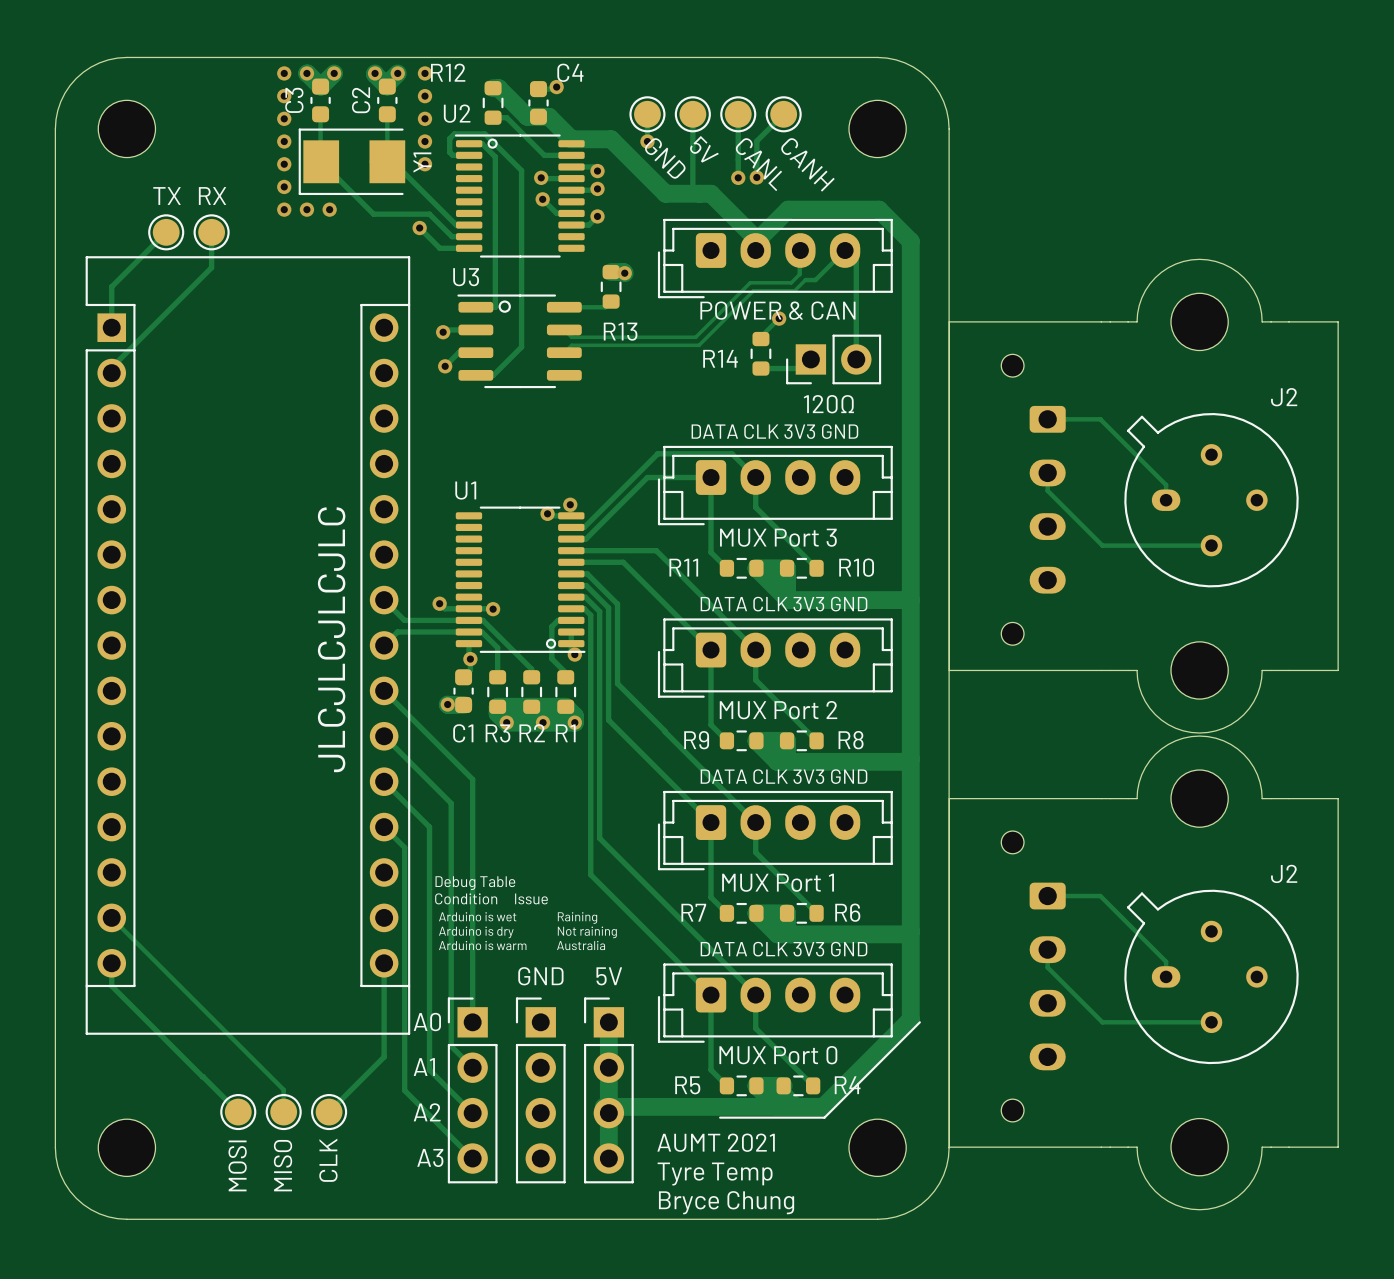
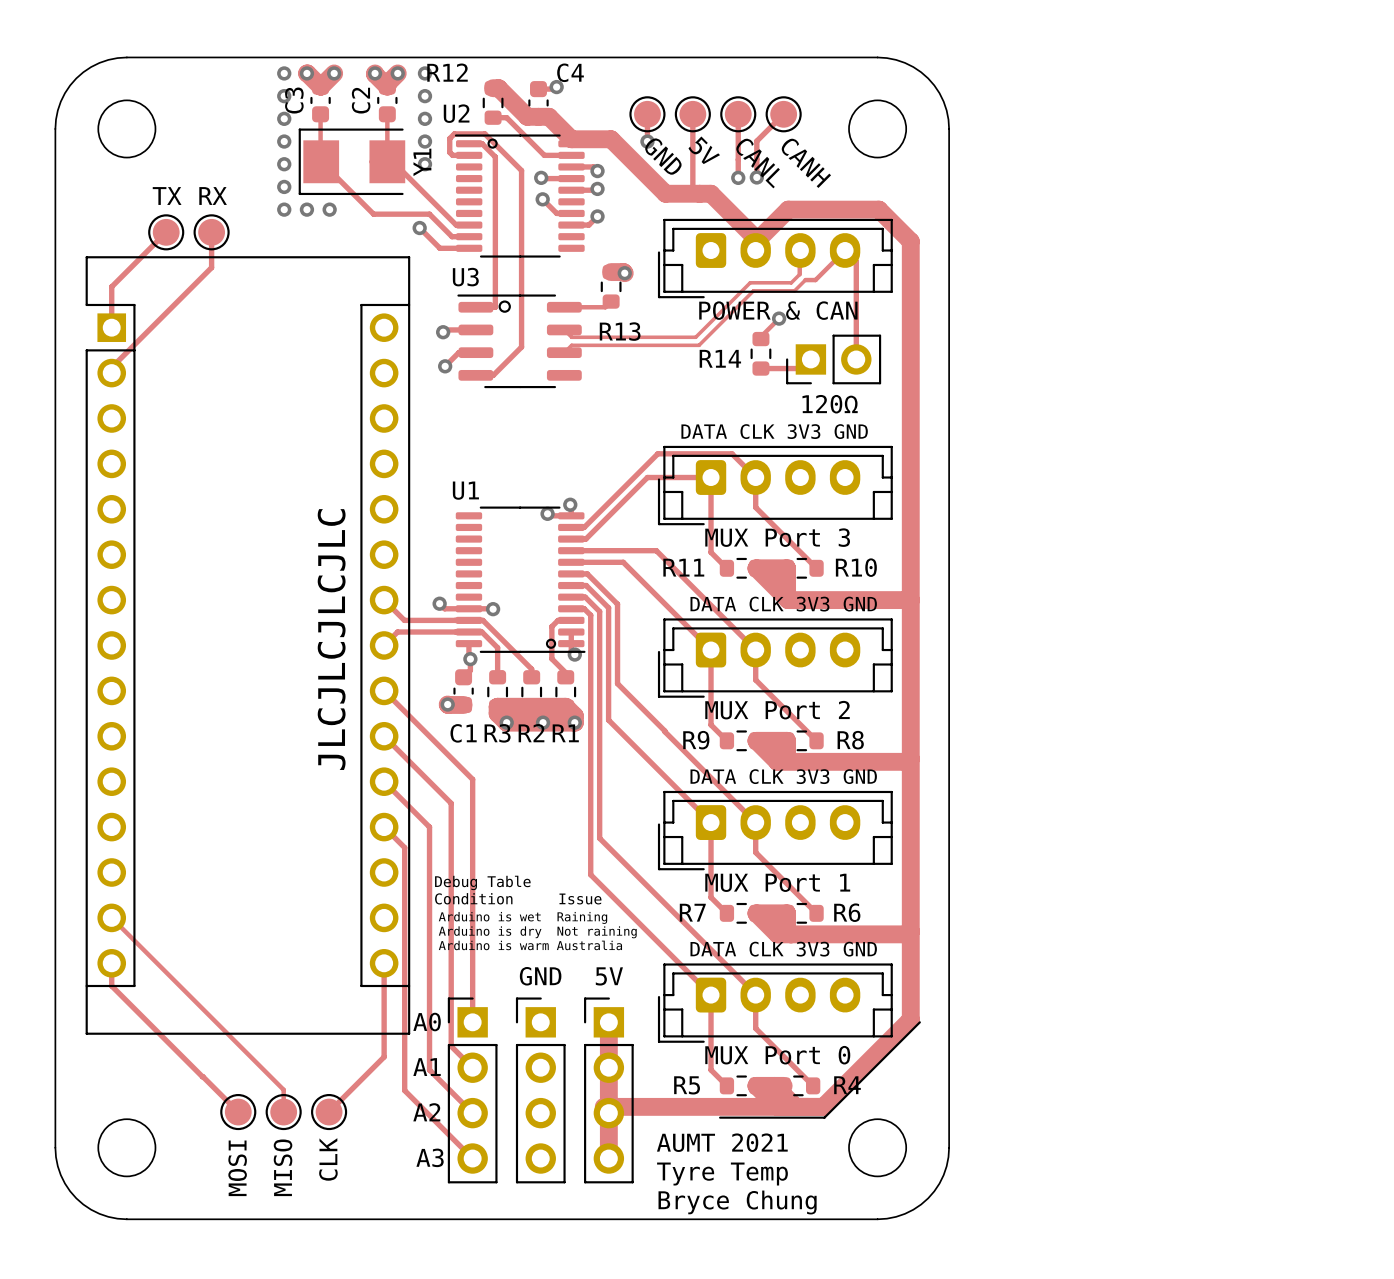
board edge: (949, 321) (1137, 321) (1141, 297) (1155, 277) (1175, 264) (1199, 259) (1223, 264) (1243, 277) (1257, 297) (1262, 321) (1338, 321) (1338, 670) (1262, 670) (1257, 694) (1243, 714) (1223, 728) (1199, 733) (1175, 728) (1155, 714) (1141, 694) (1137, 670) (949, 670) (949, 321) -> none
part: (1199, 321) -> none
track: (1047, 419) (1100, 419) (1166, 485) (1166, 500) -> none
track: (1047, 472) (1047, 490) (1102, 545) (1211, 545) -> none
part: (1033, 499) -> none
J2: (1211, 500) -> none
part: (1199, 670) -> none
board edge: (949, 798) (949, 1147) (1137, 1147) (1141, 1171) (1155, 1191) (1175, 1204) (1199, 1209) (1223, 1204) (1243, 1191) (1257, 1171) (1262, 1147) (1338, 1147) (1338, 798) (1262, 798) (1257, 774) (1243, 754) (1223, 740) (1199, 736) (1175, 740) (1155, 754) (1141, 774) (1137, 798) (949, 798) -> none
part: (1199, 798) -> none
track: (1047, 896) (1100, 896) (1166, 961) (1166, 976) -> none
track: (1047, 949) (1047, 967) (1102, 1022) (1211, 1022) -> none
part: (1033, 976) -> none
J2: (1211, 976) -> none
part: (1199, 1147) -> none

